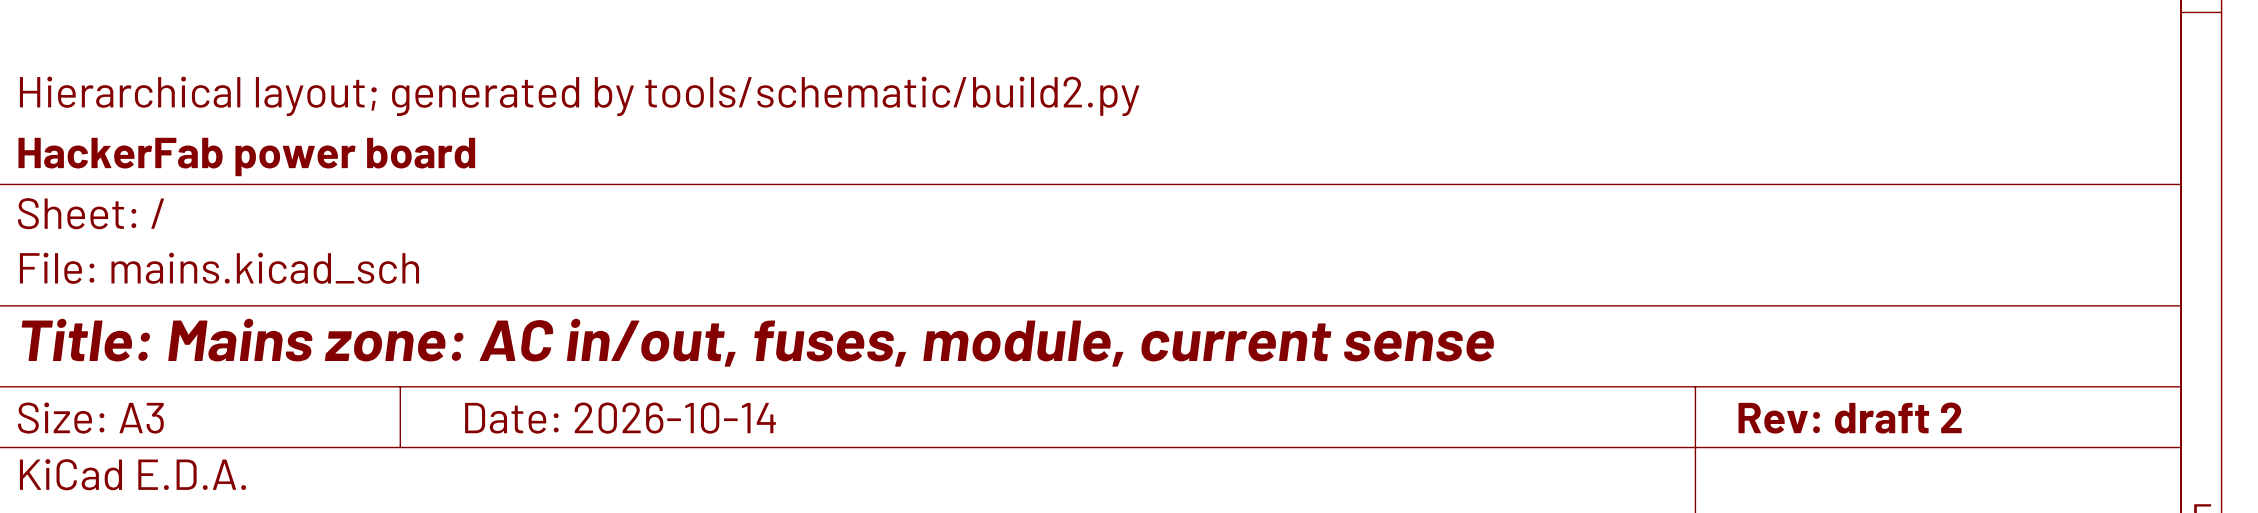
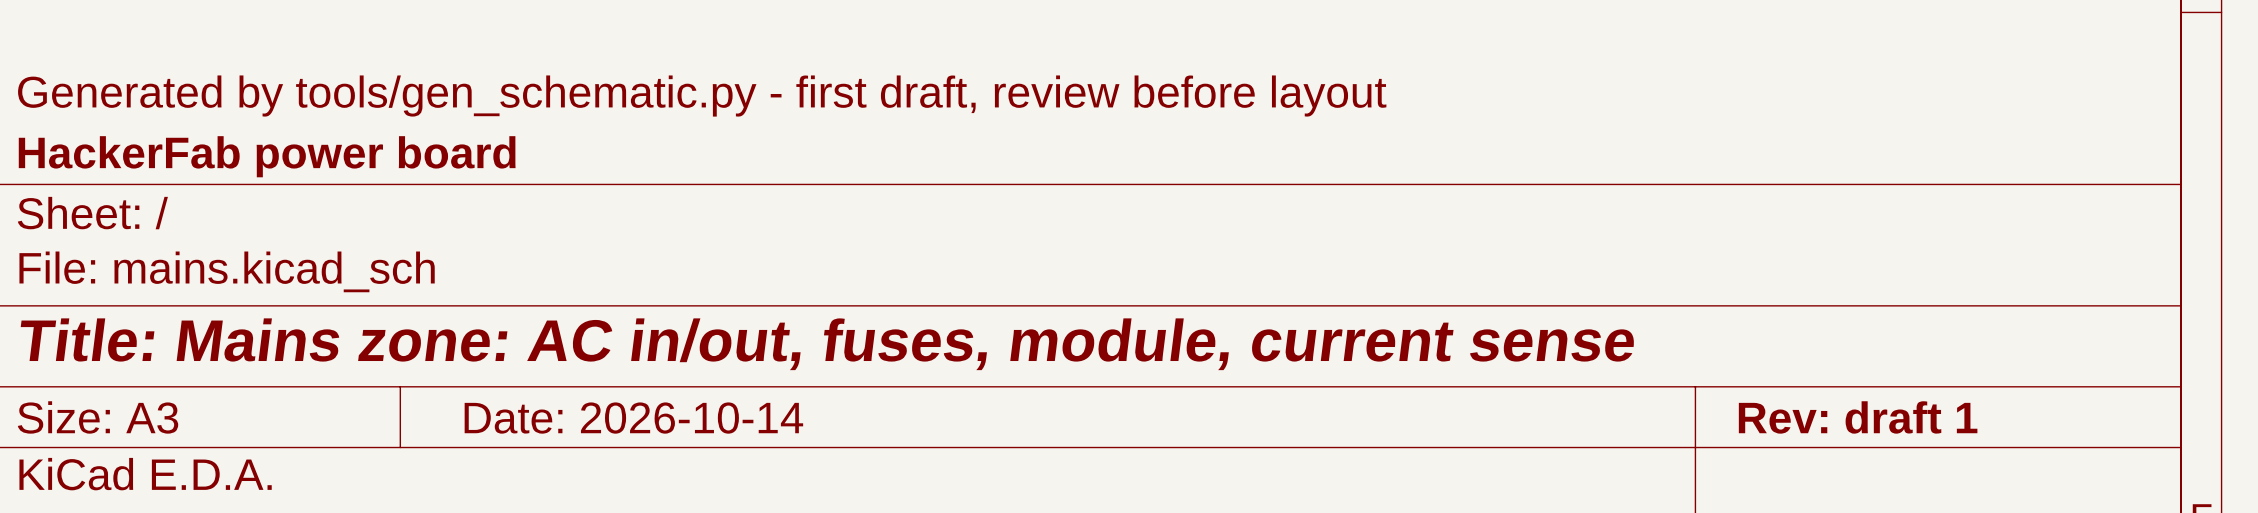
title block: Hierarchical layout; generated by tools/schematic/build2.py (579, 96) -> Generated by tools/gen_schematic.py - first draft, review before layout (702, 96)
title block: Rev: draft 2 (1850, 418) -> Rev: draft 1 (1858, 417)

